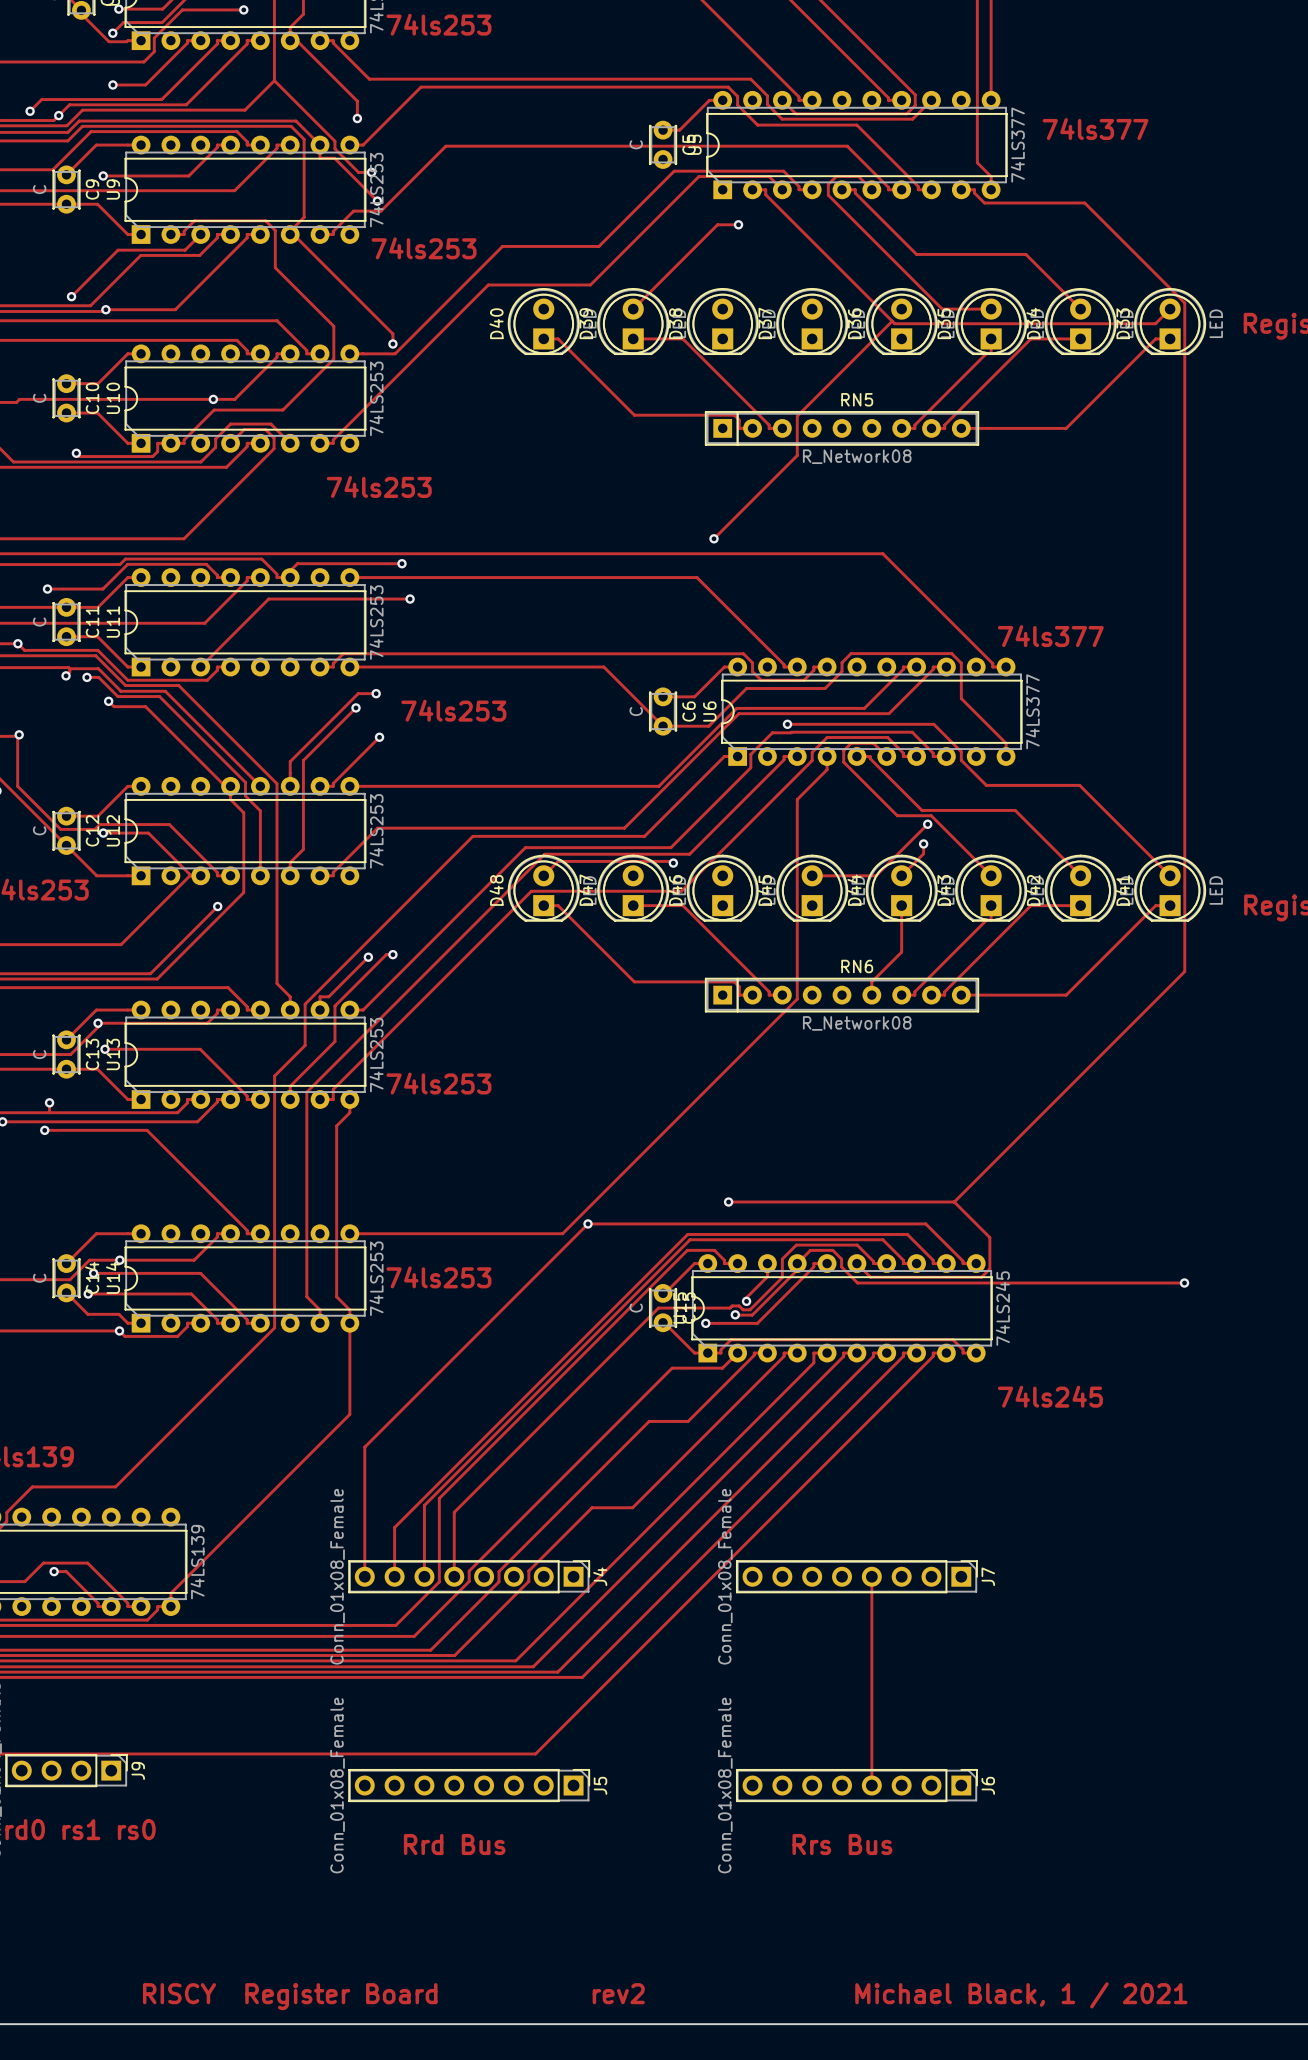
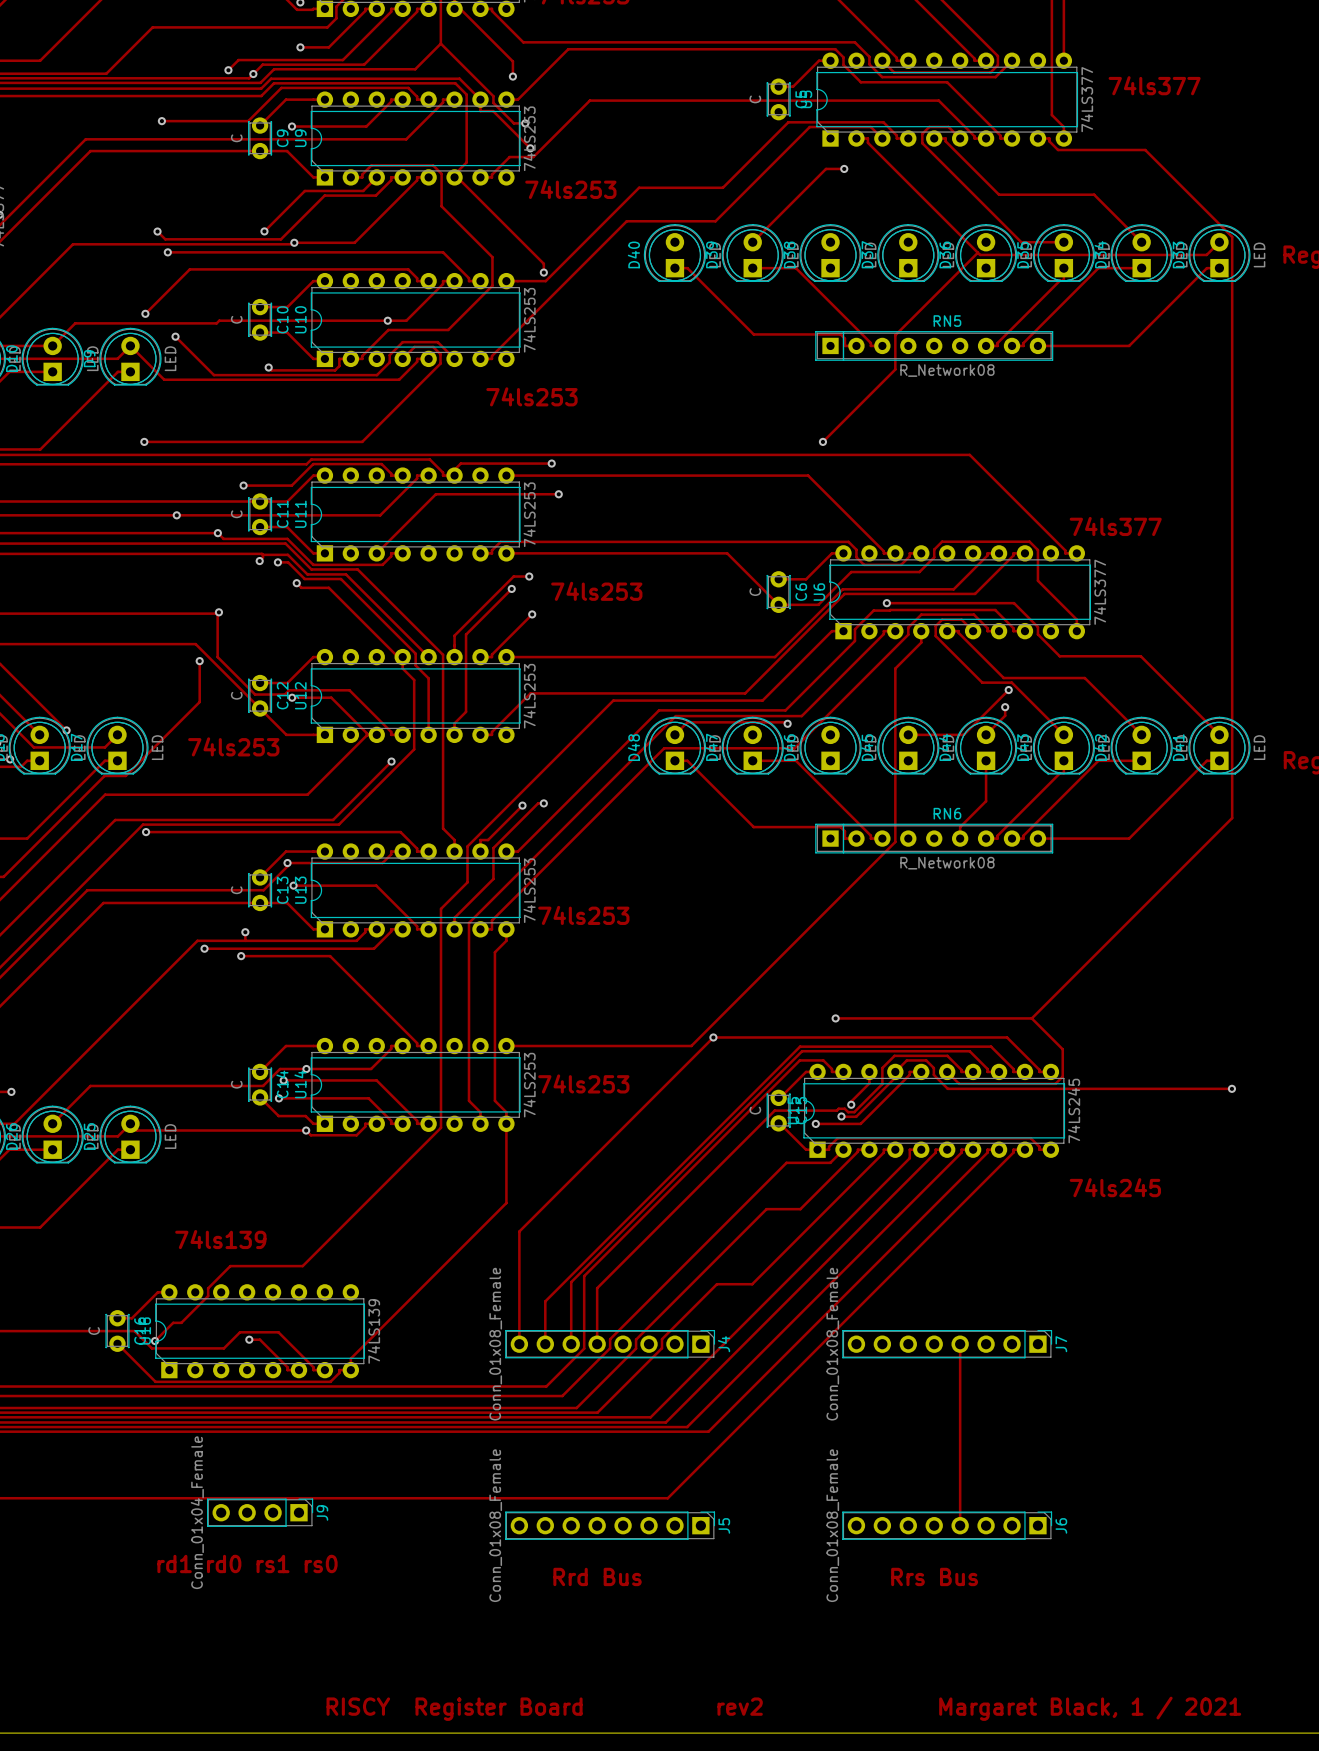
text: Michael Black, 1 / 2021 (1021, 1995) -> Margaret Black, 1 / 2021 (1090, 1708)

